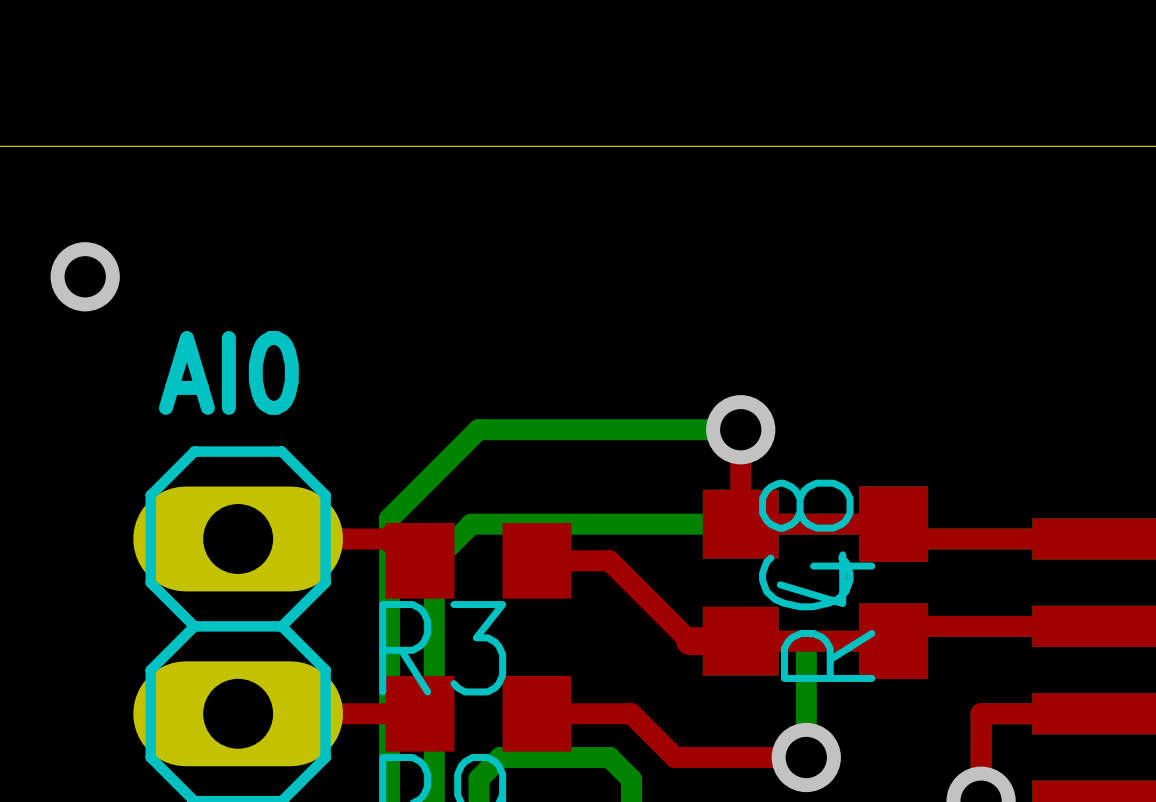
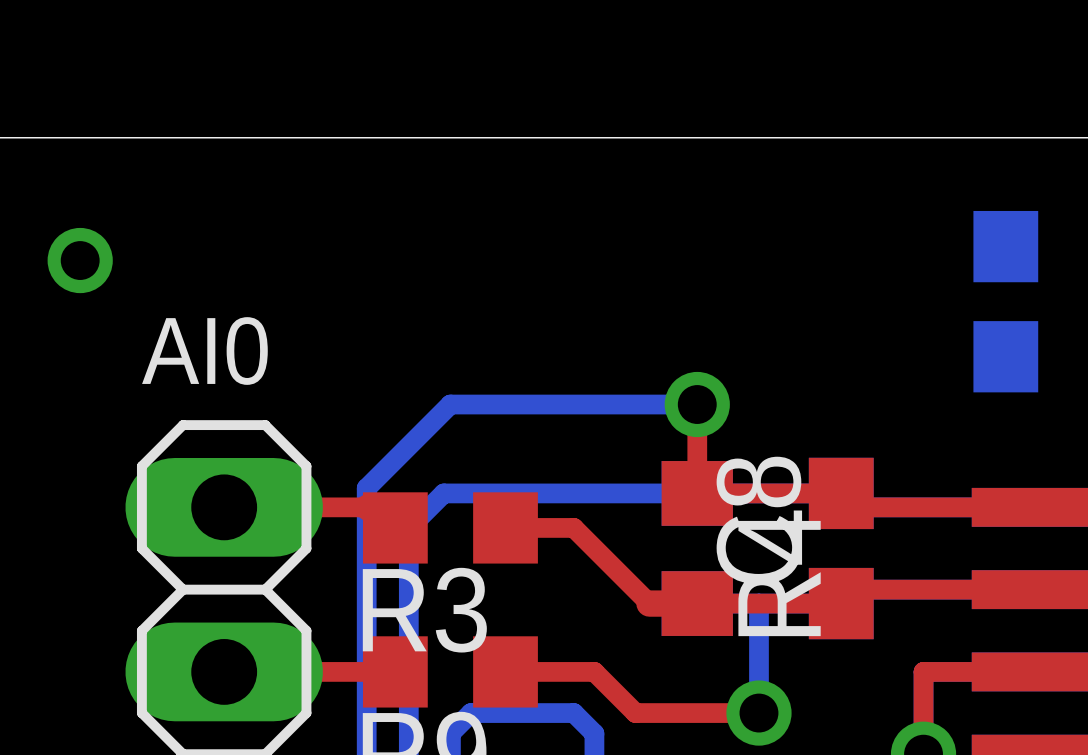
part: none -> (1005, 301)

